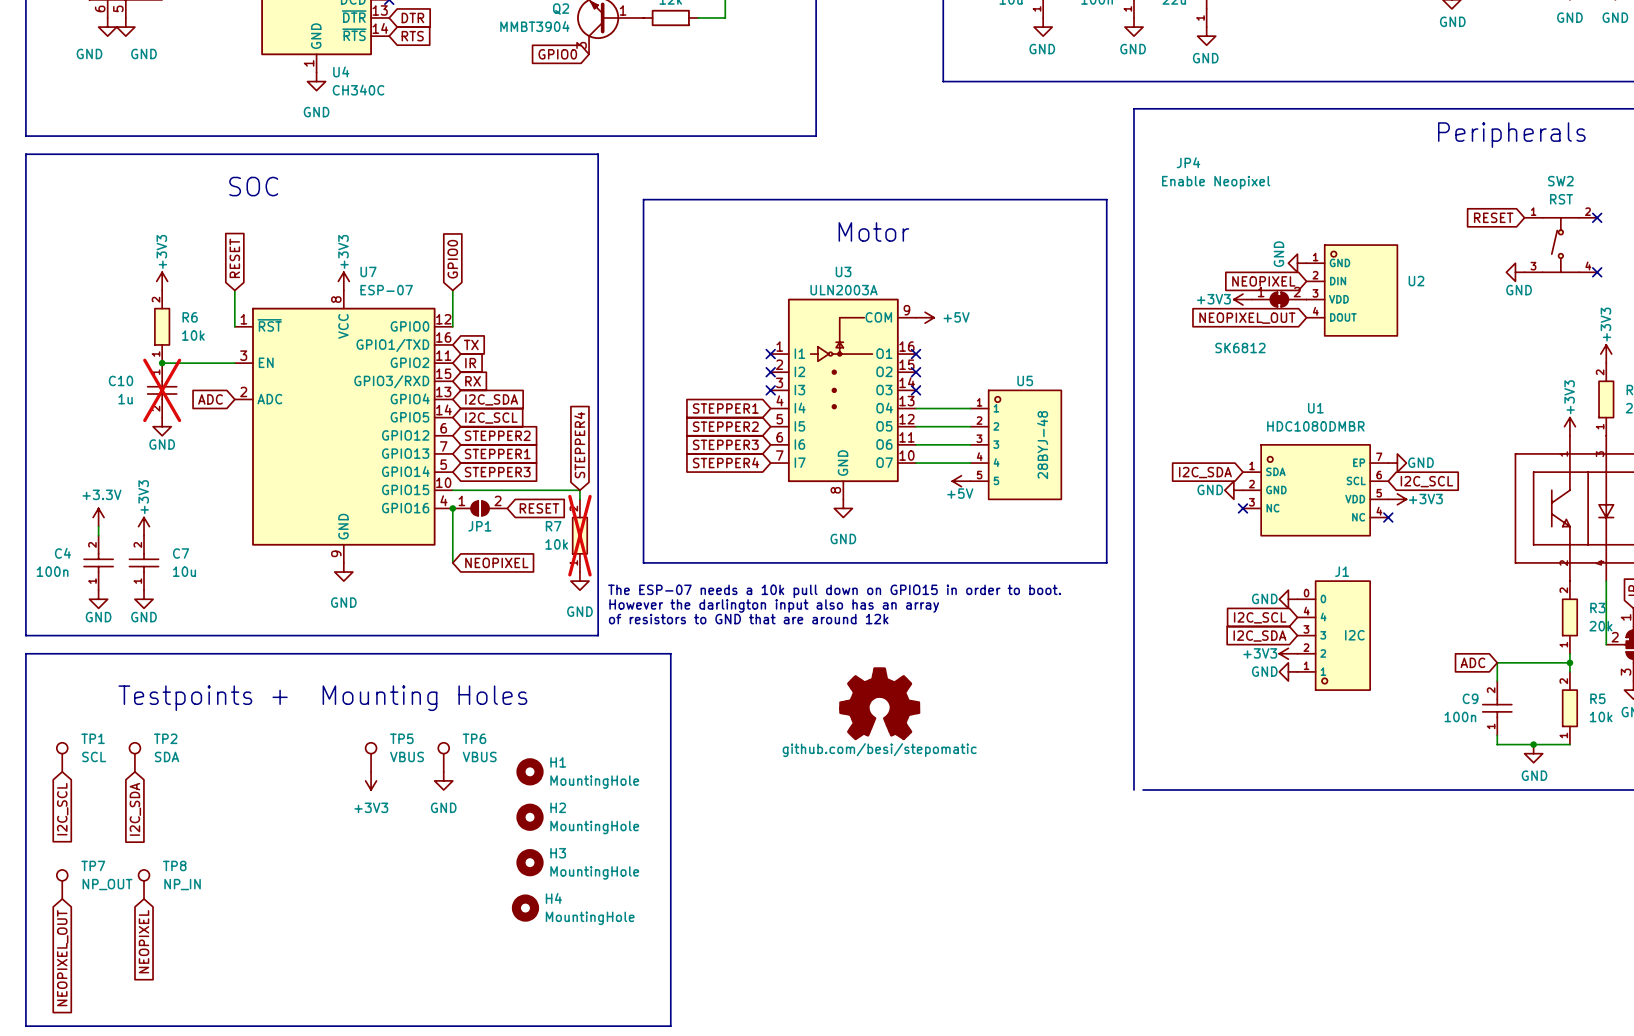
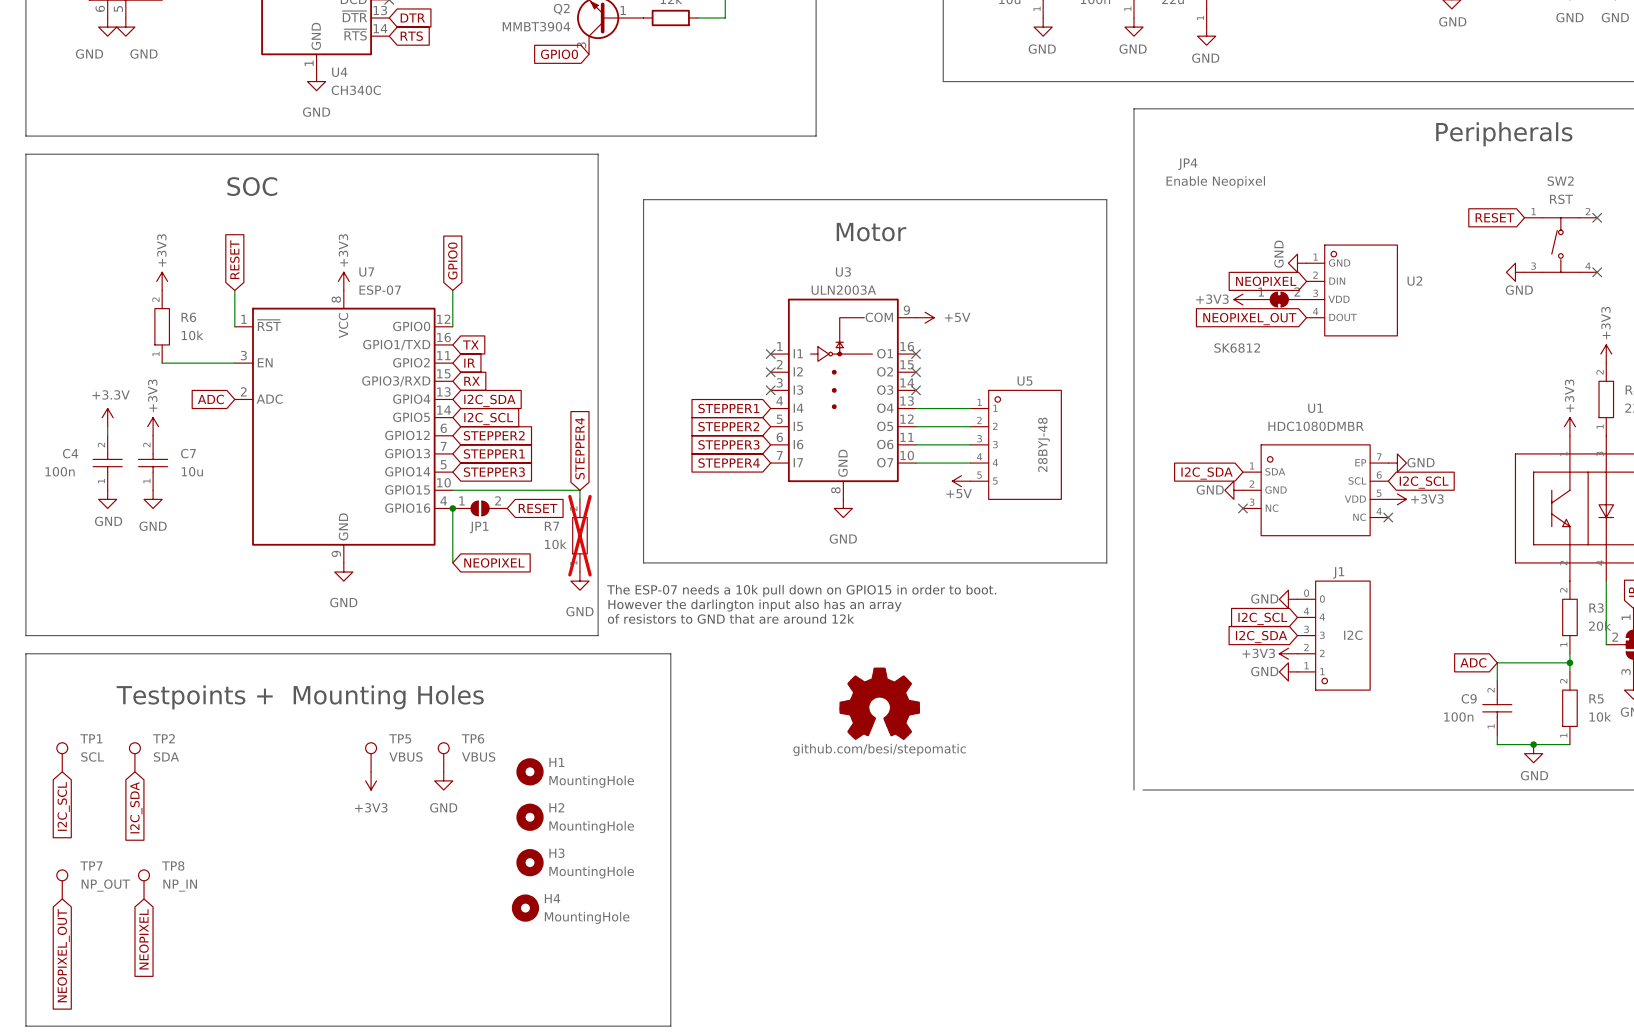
junction: (162, 363) -> none
C10: 1u (162, 390) -> none
power symbol: GND (162, 426) -> none
power symbol: none -> GND (107, 499)
power symbol: none -> GND (153, 499)
power symbol position: +3.3V (98, 517) -> +3.3V (107, 417)
wire: (98, 526) (98, 535) -> (107, 426) (107, 435)
power symbol position: +3V3 (144, 526) -> +3V3 (153, 426)
C4 position: (98, 562) -> (107, 463)
C7 position: (144, 562) -> (153, 463)
power symbol: GND (98, 599) -> none
power symbol: GND (144, 599) -> none

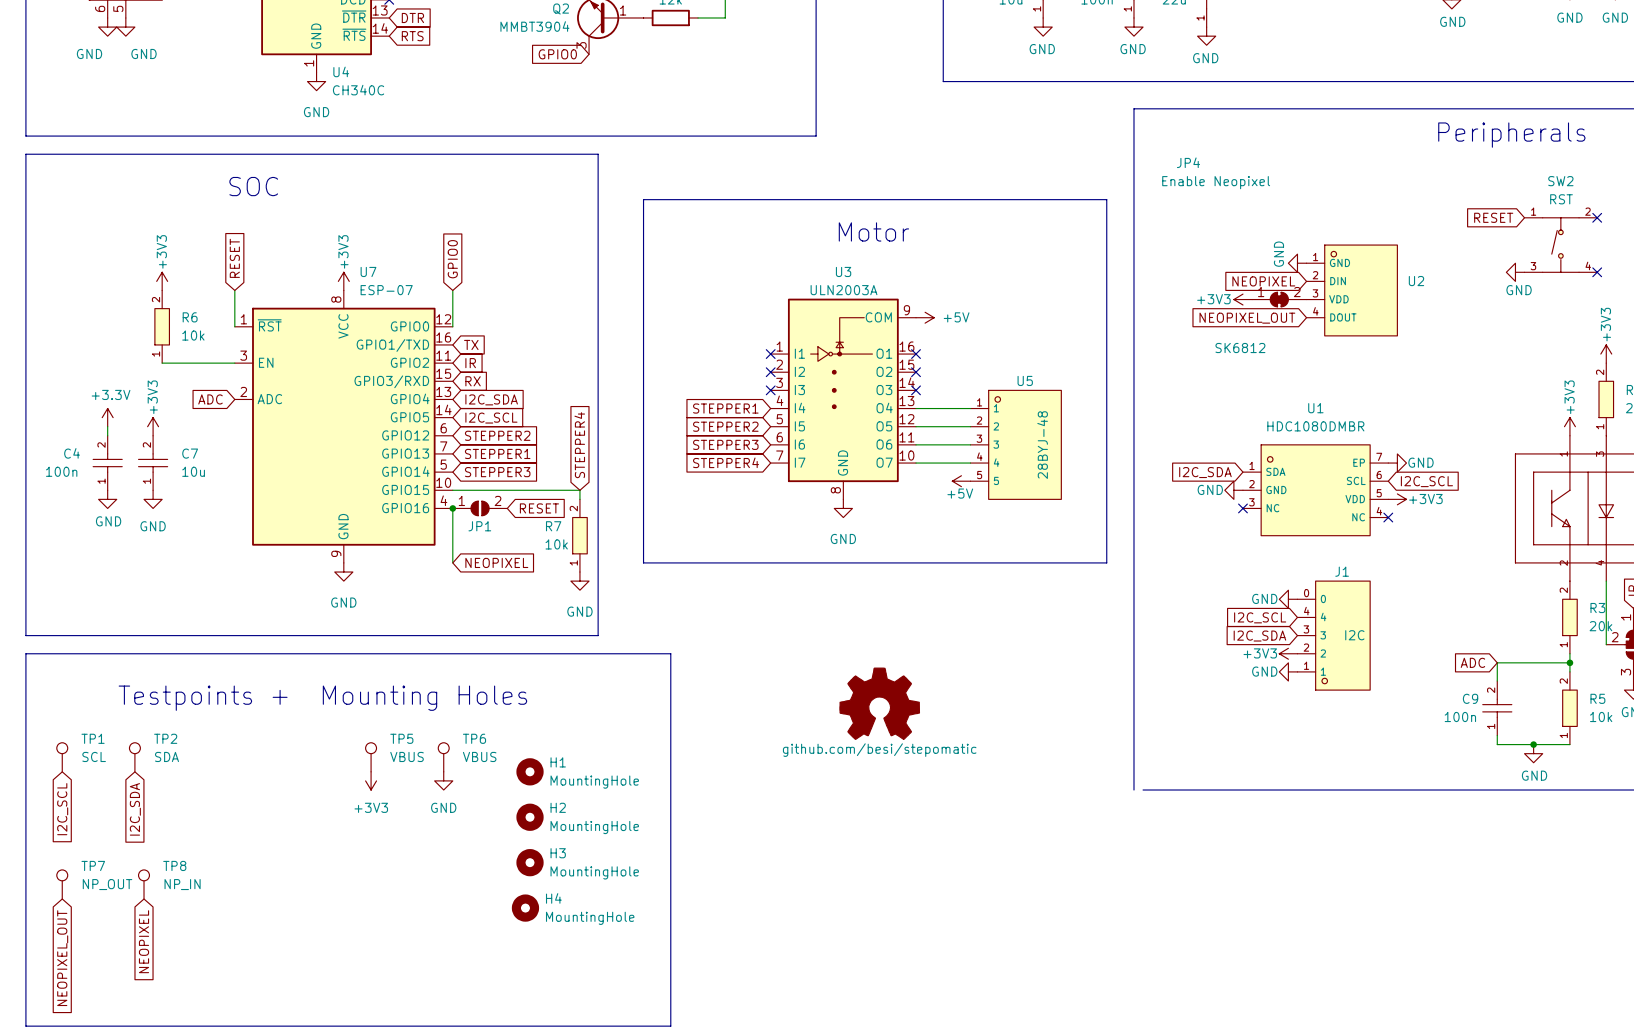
R7 do-not-place cross: (579, 535) -> none
text: The ESP-07 needs a 10k pull down on GPIO15 in order to boot. (801, 590) -> none
text: However the darlington input also has an array (754, 605) -> none
text: of resistors to GND that are around 12k (731, 618) -> none

